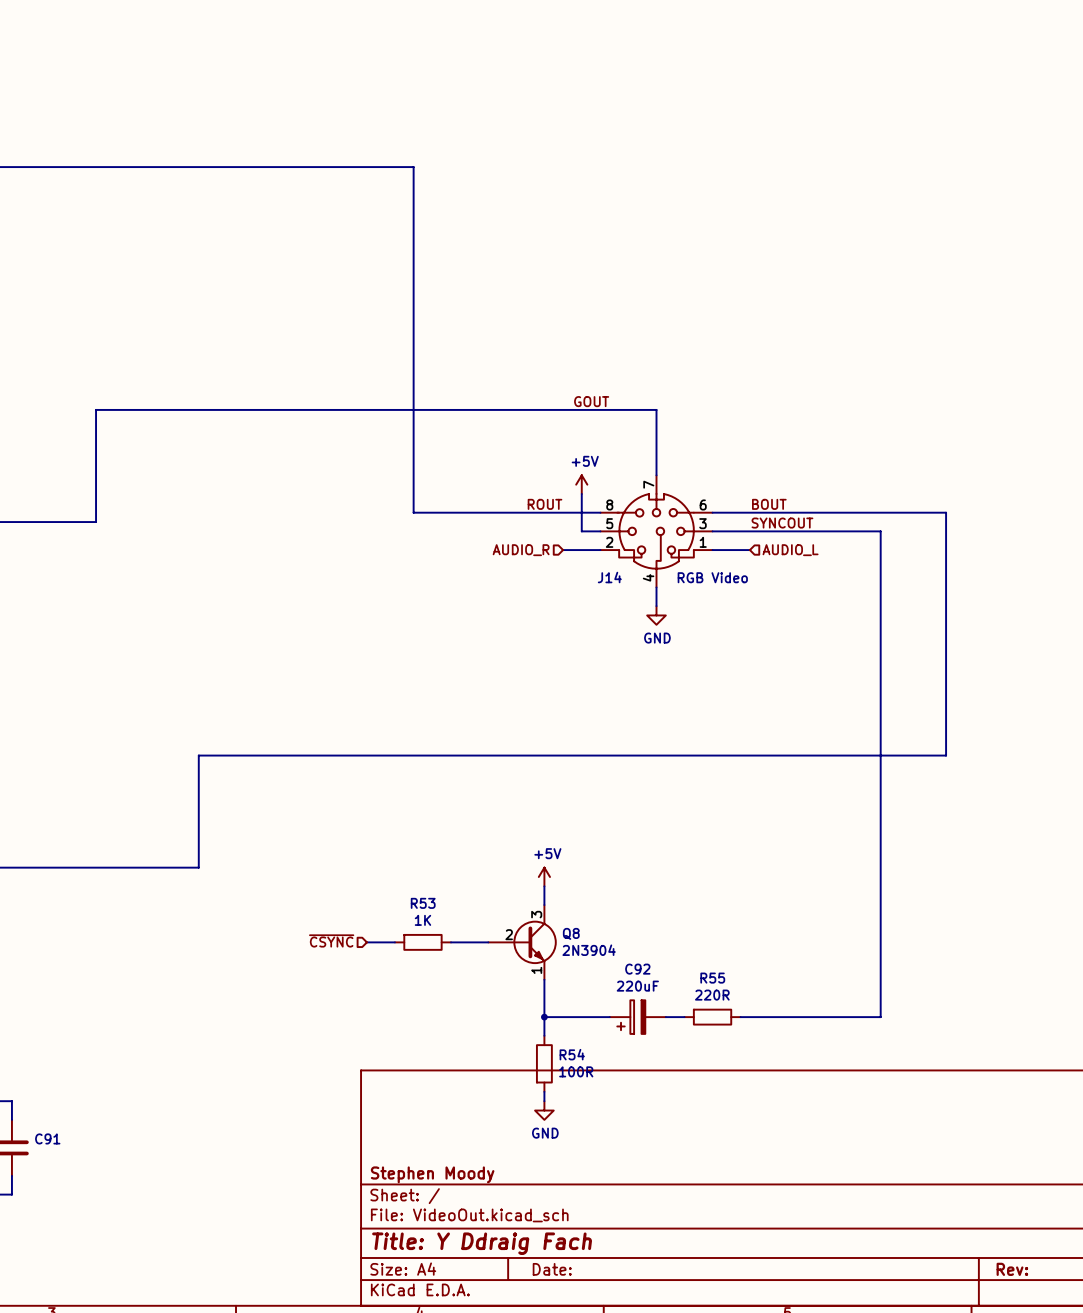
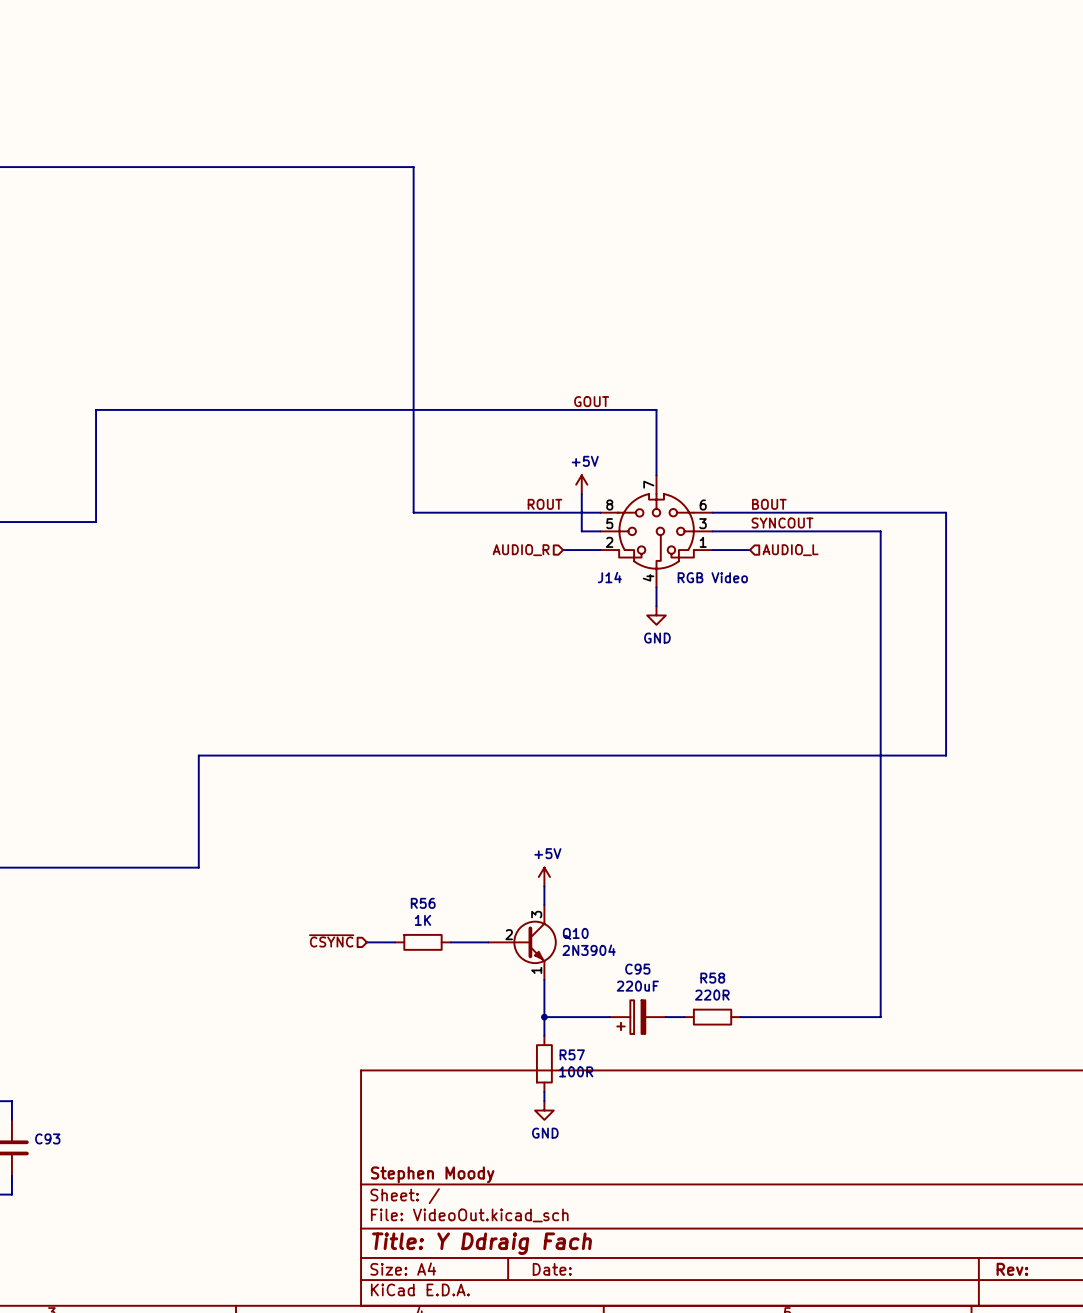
R53 name: R53 (423, 903) -> R56 (423, 903)
Q8 name: Q8 (571, 933) -> Q10 (575, 933)
C92 name: C92 (637, 969) -> C95 (637, 969)
R55 name: R55 (712, 978) -> R58 (712, 978)
R54 name: R54 (572, 1054) -> R57 (572, 1054)
C91 name: C91 (47, 1138) -> C93 (47, 1138)

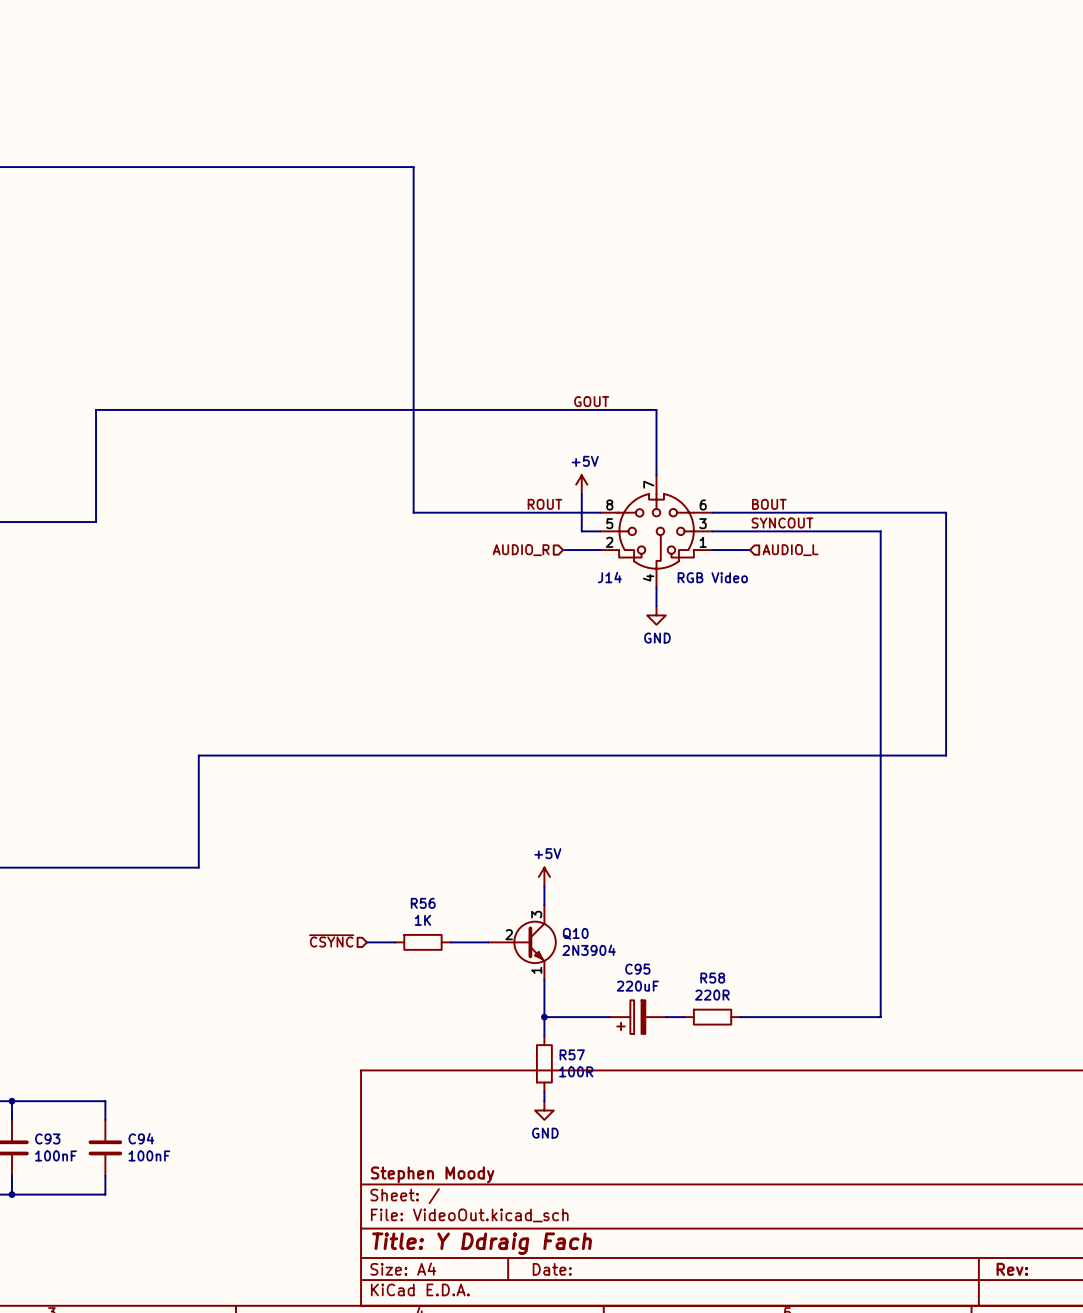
wire: none -> (11, 1101) (105, 1101) (105, 1119)
junction: none -> (11, 1101)
C94: none -> 100nF (105, 1147)
C93 value: none -> 100nF (55, 1155)
wire: none -> (105, 1175) (105, 1194) (11, 1194)
junction: none -> (11, 1194)

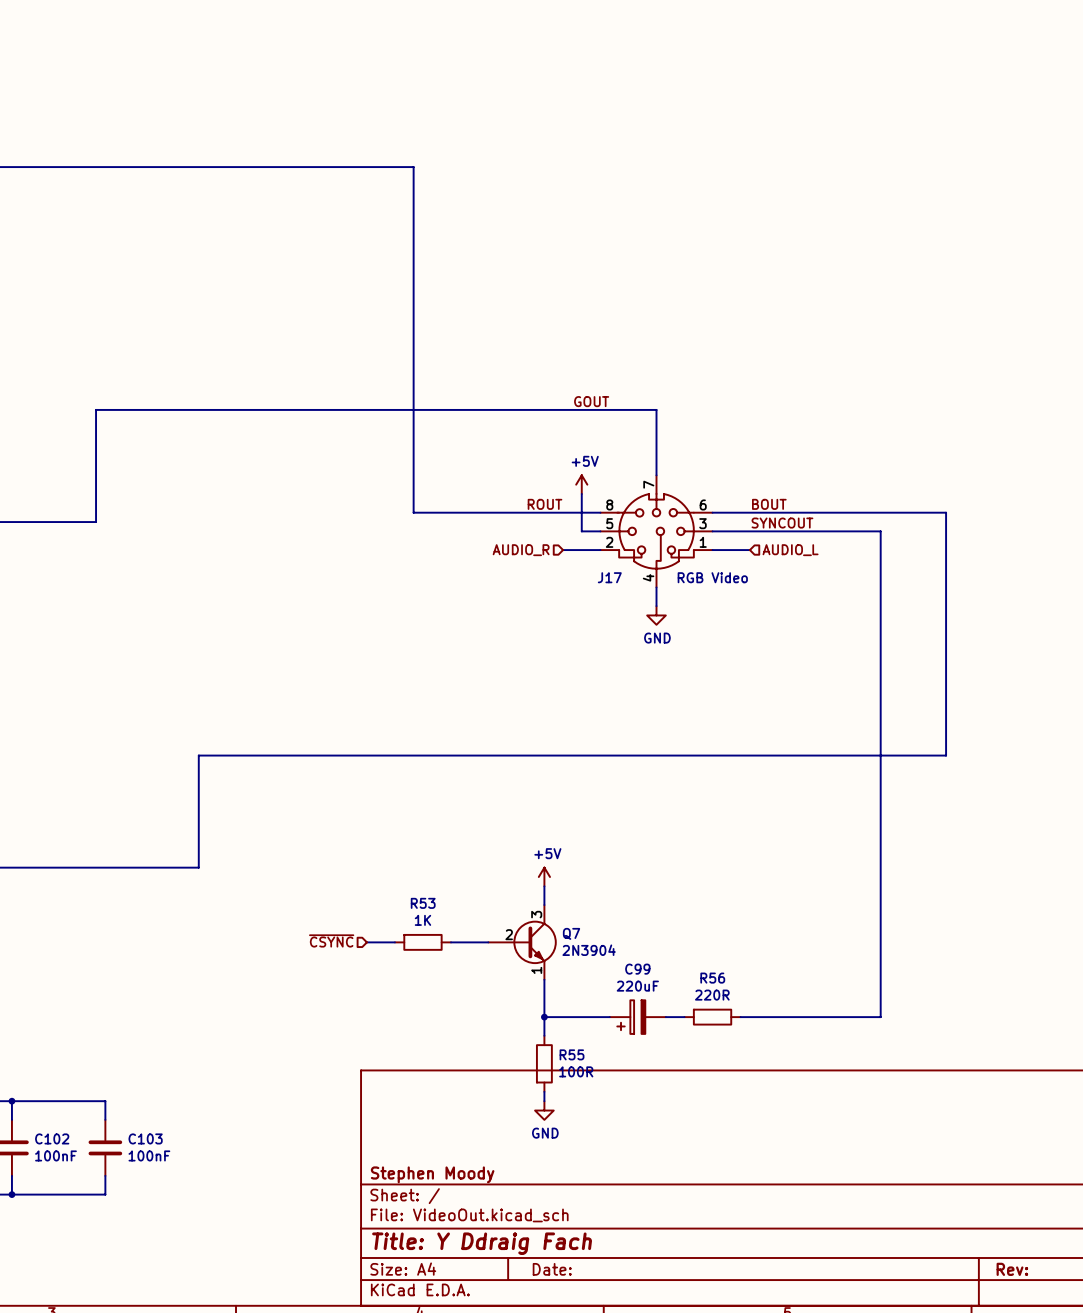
J14 name: J14 (609, 577) -> J17 (609, 577)
R56 name: R56 (423, 903) -> R53 (423, 903)
Q10 name: Q10 (575, 933) -> Q7 (571, 933)
C95 name: C95 (637, 969) -> C99 (637, 969)
R58 name: R58 (712, 978) -> R56 (712, 978)
R57 name: R57 (572, 1054) -> R55 (572, 1054)
C93 name: C93 (47, 1138) -> C102 (52, 1138)
C94 name: C94 (141, 1138) -> C103 (145, 1138)

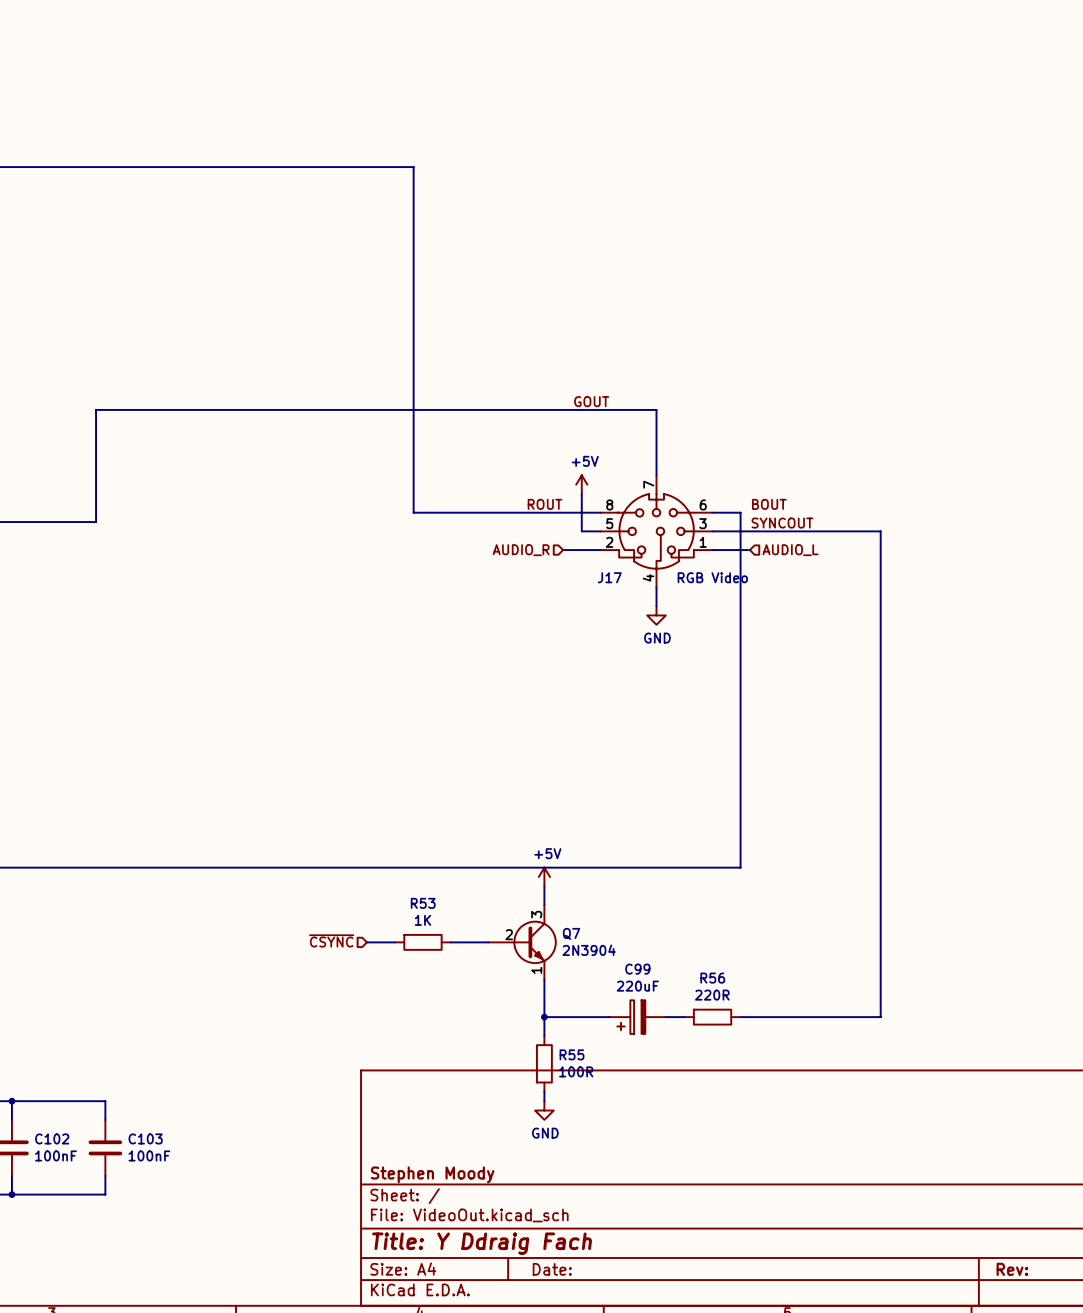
wire: (740, 512) (946, 512) (946, 755) (198, 755) (198, 867) -> (740, 512) (740, 867) (198, 867)

